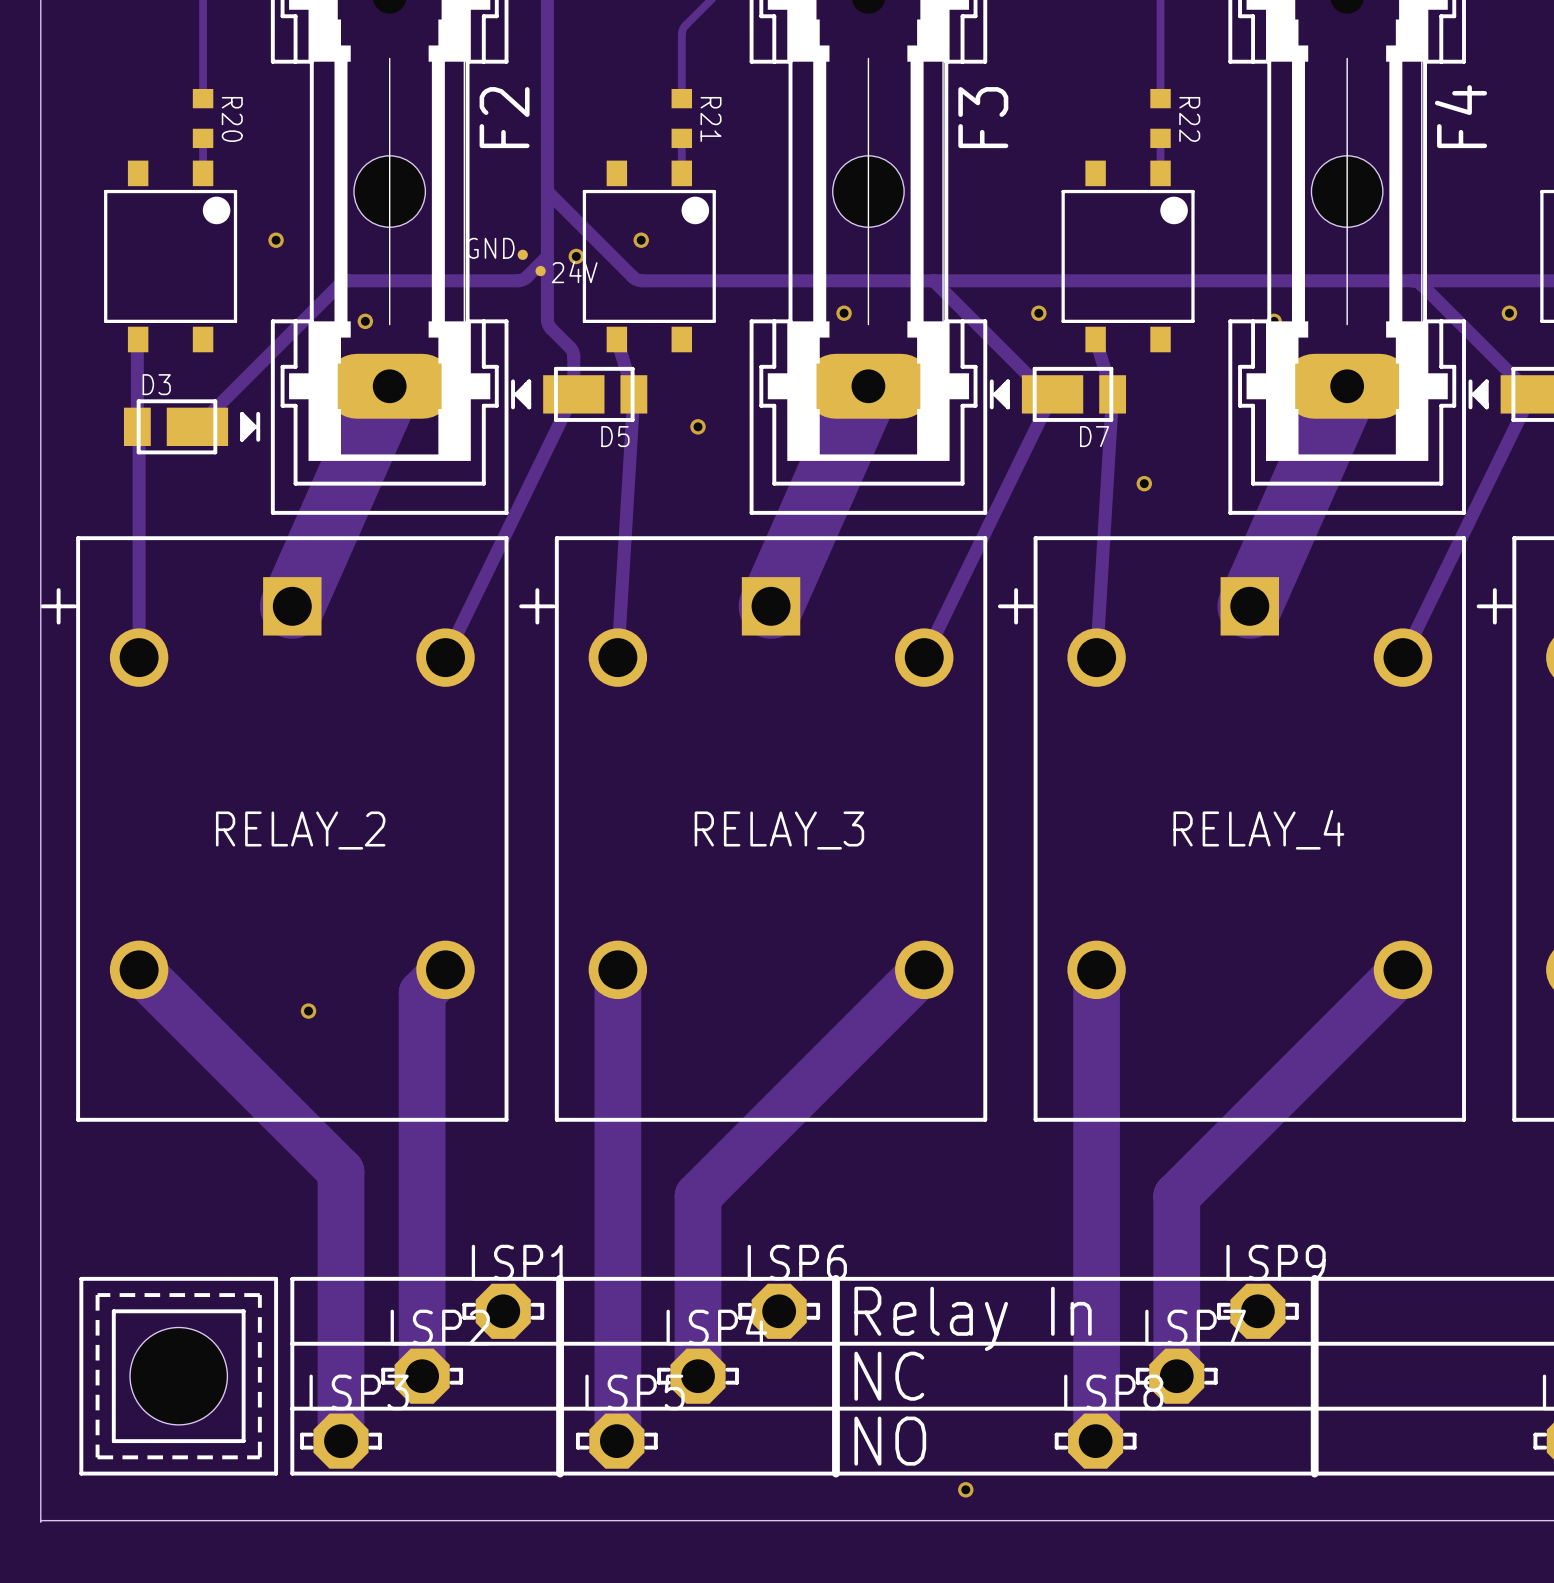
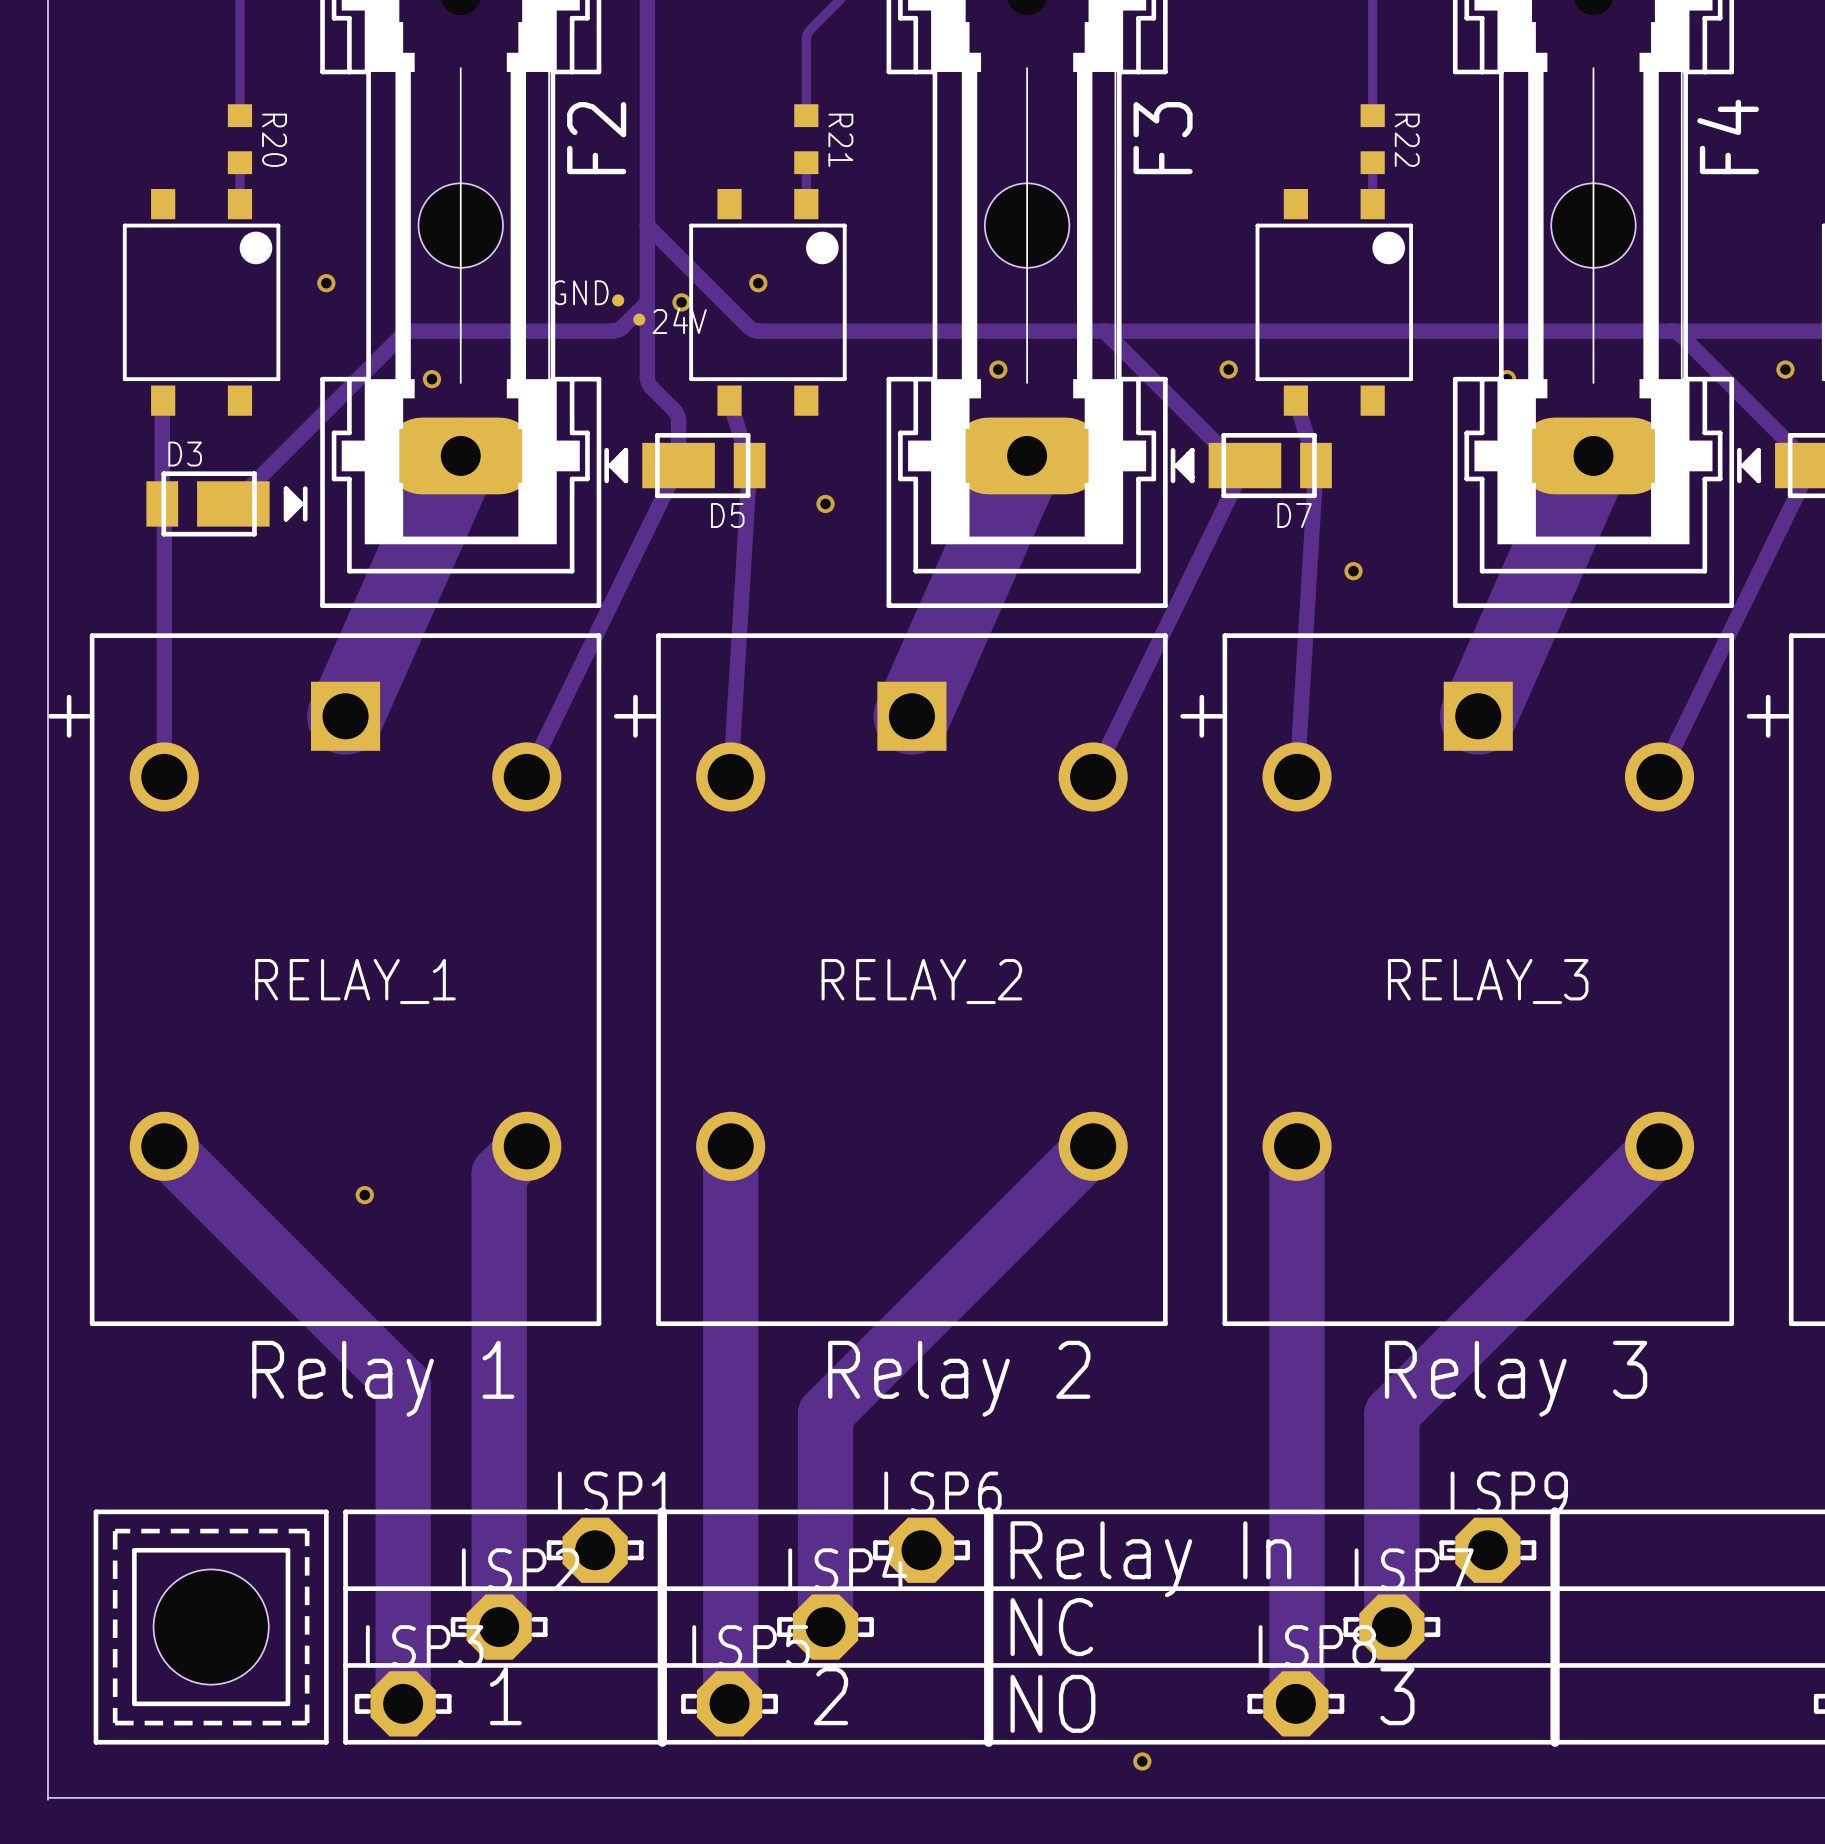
RELAY_4 name: RELAY_4 (1258, 829) -> RELAY_3 (1488, 981)
RELAY_2 name: RELAY_2 (300, 830) -> RELAY_1 (355, 981)
RELAY_3 name: RELAY_3 (779, 830) -> RELAY_2 (921, 981)
text: none -> Relay 1 (383, 1378)
text: none -> Relay 2 (959, 1378)
text: none -> Relay 3 (1516, 1378)
text: none -> 1 (505, 1696)
text: none -> 2 (831, 1696)
text: none -> 3 (1397, 1696)

